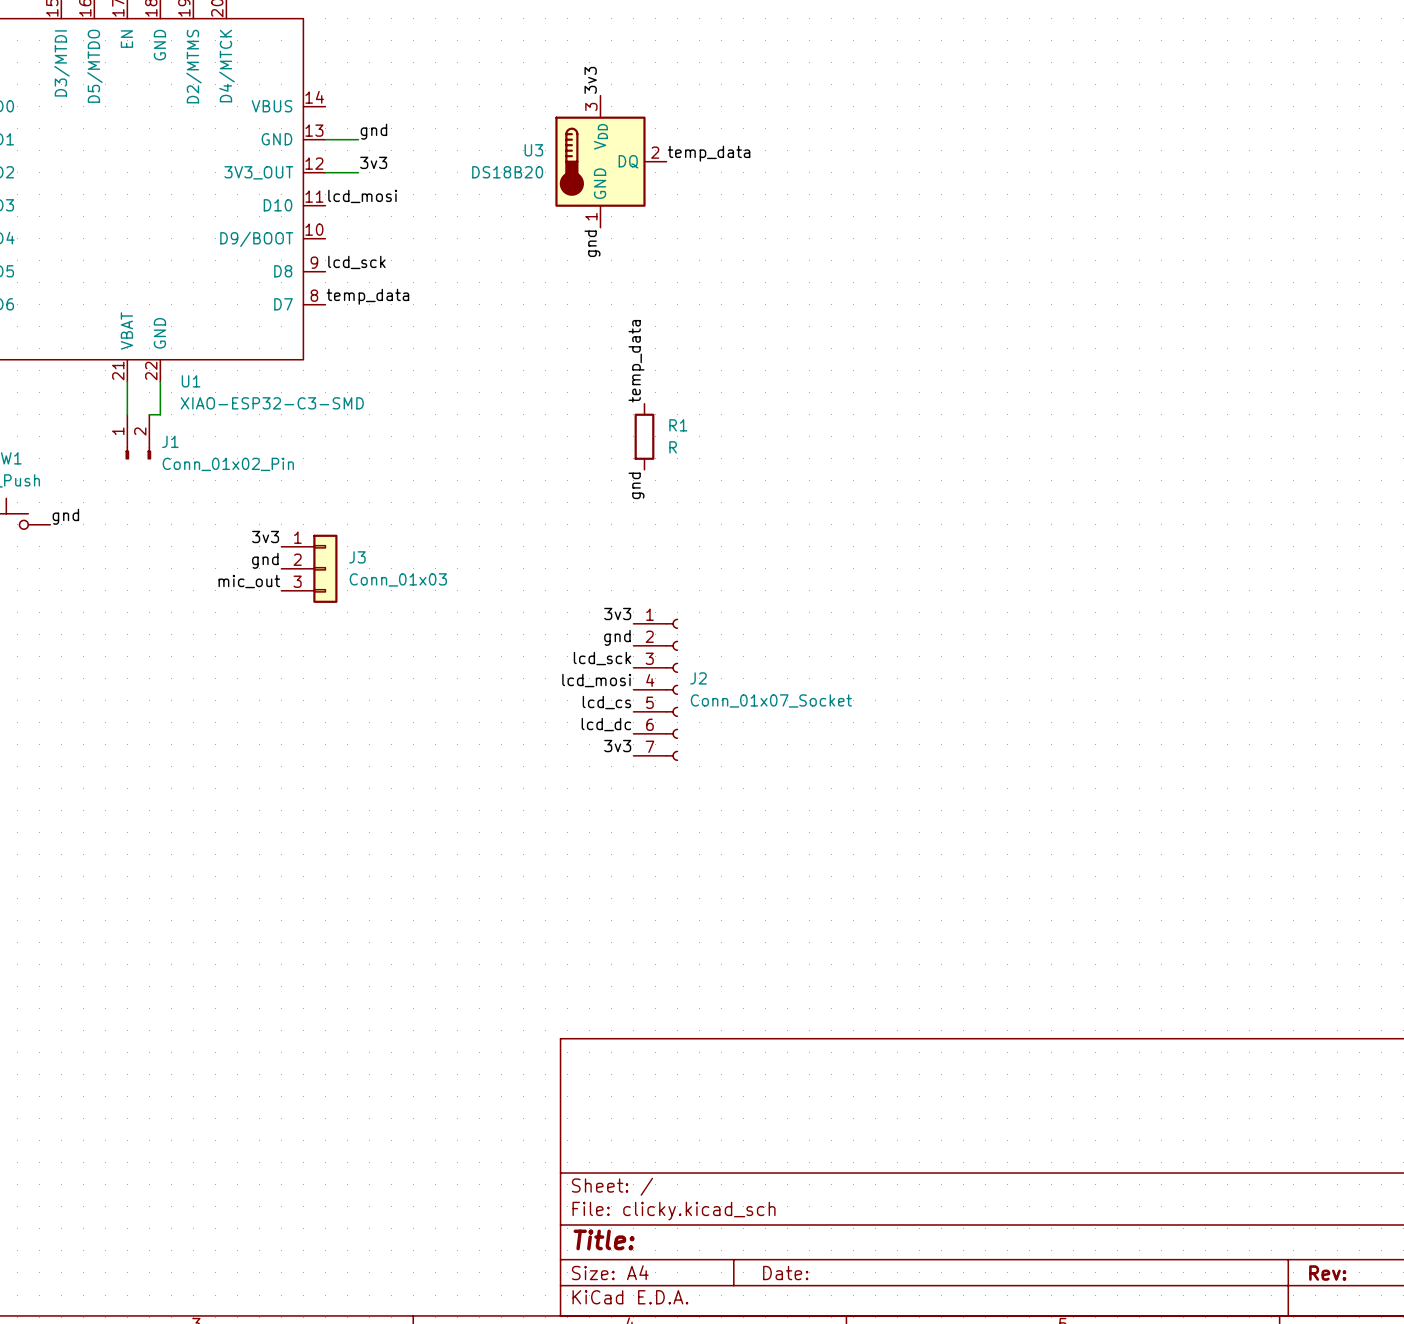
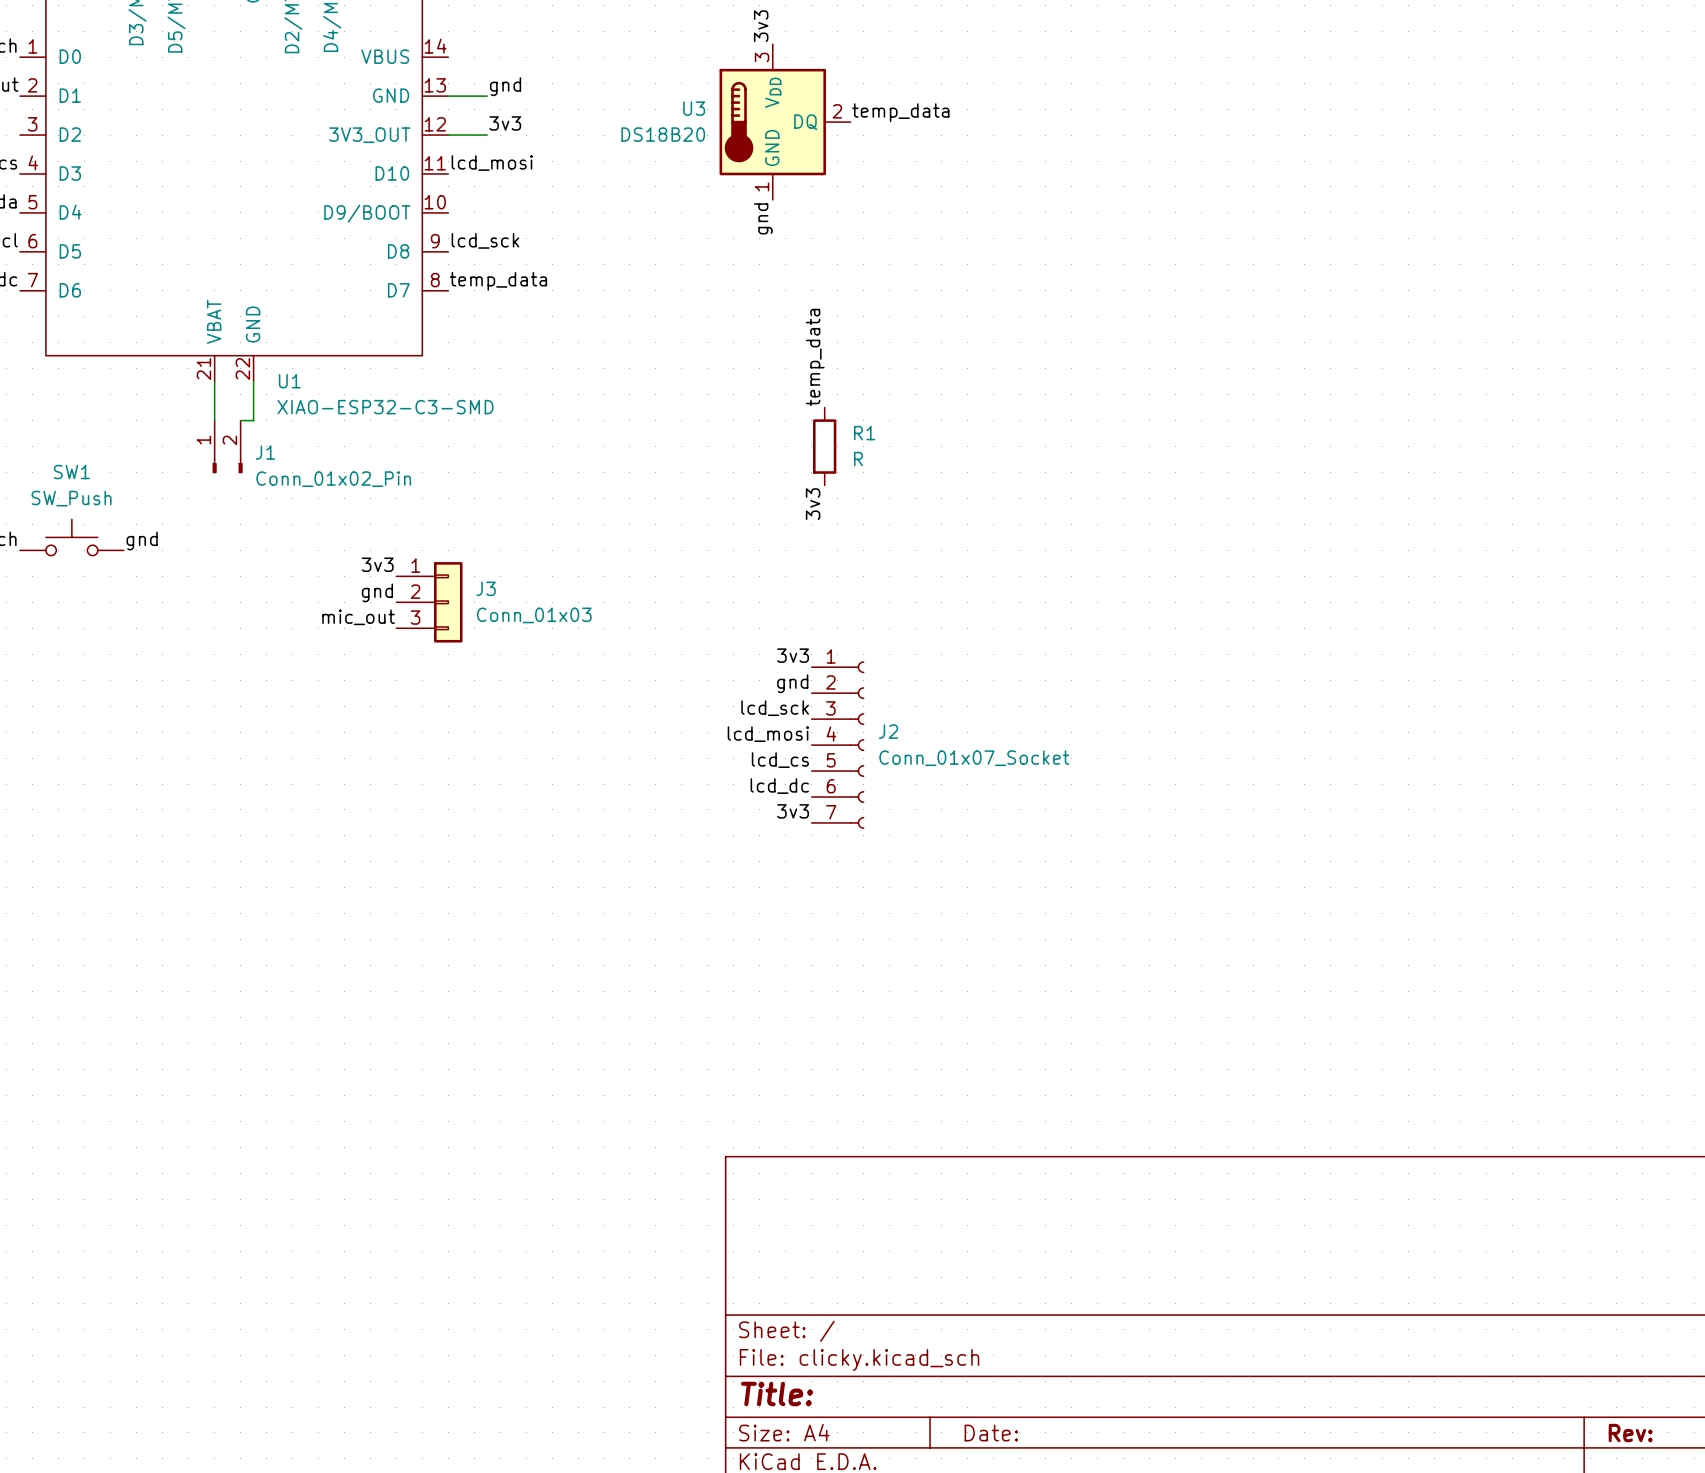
label: gnd (636, 485) -> 3v3 (813, 504)

